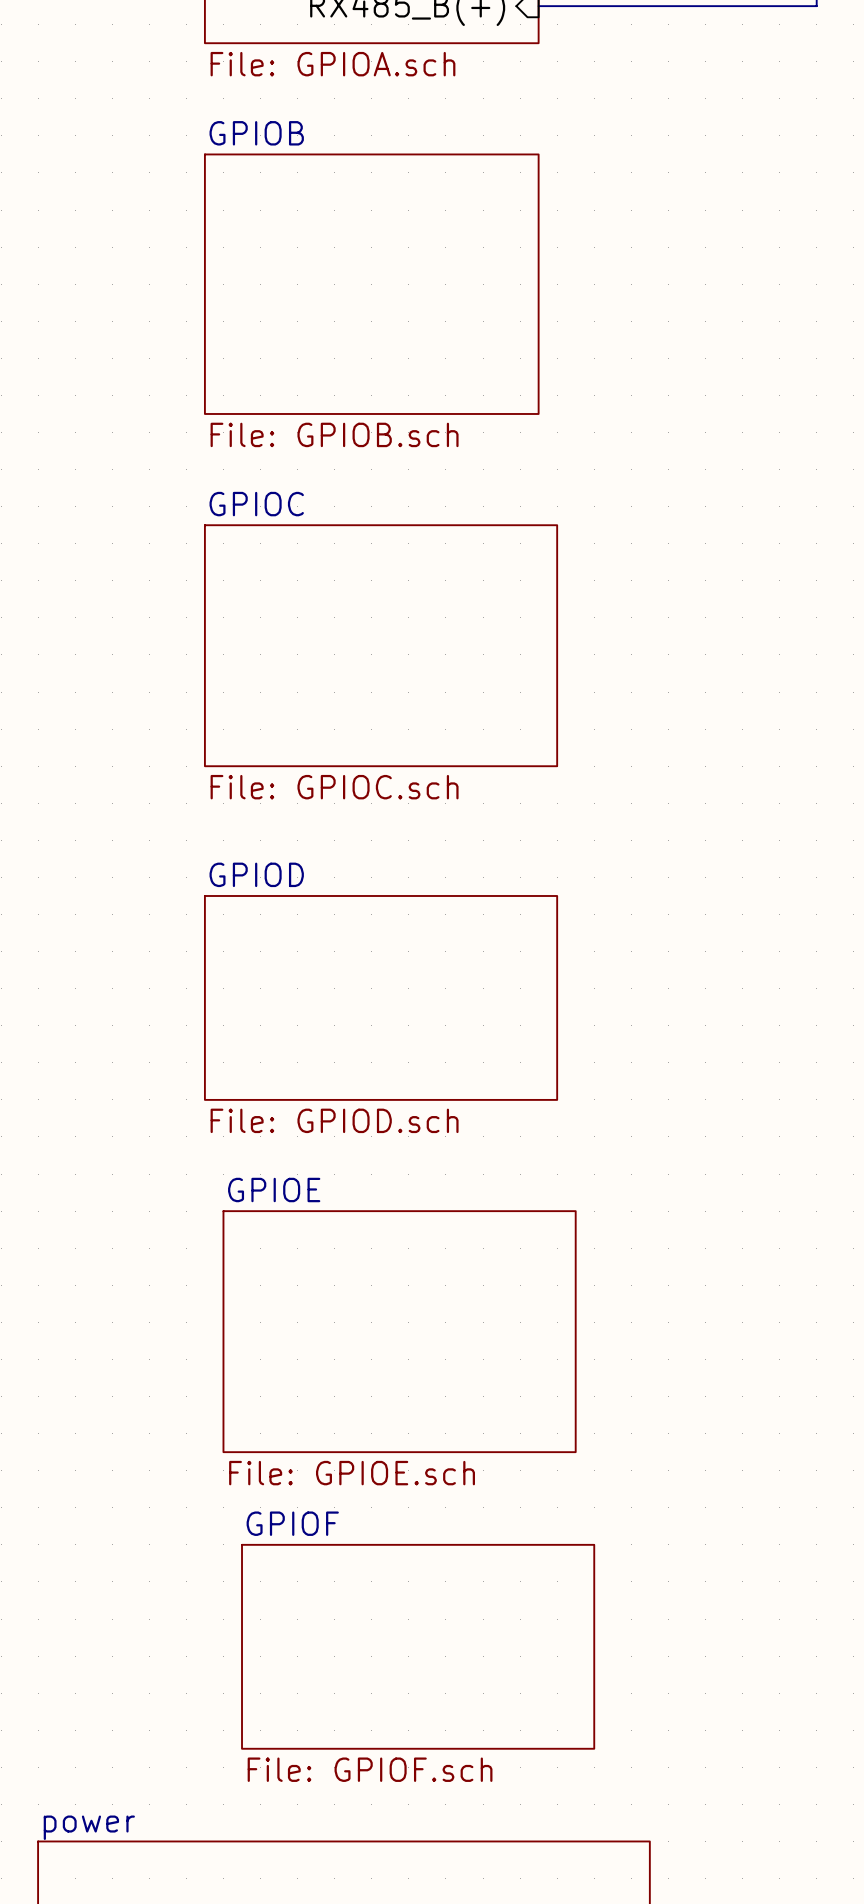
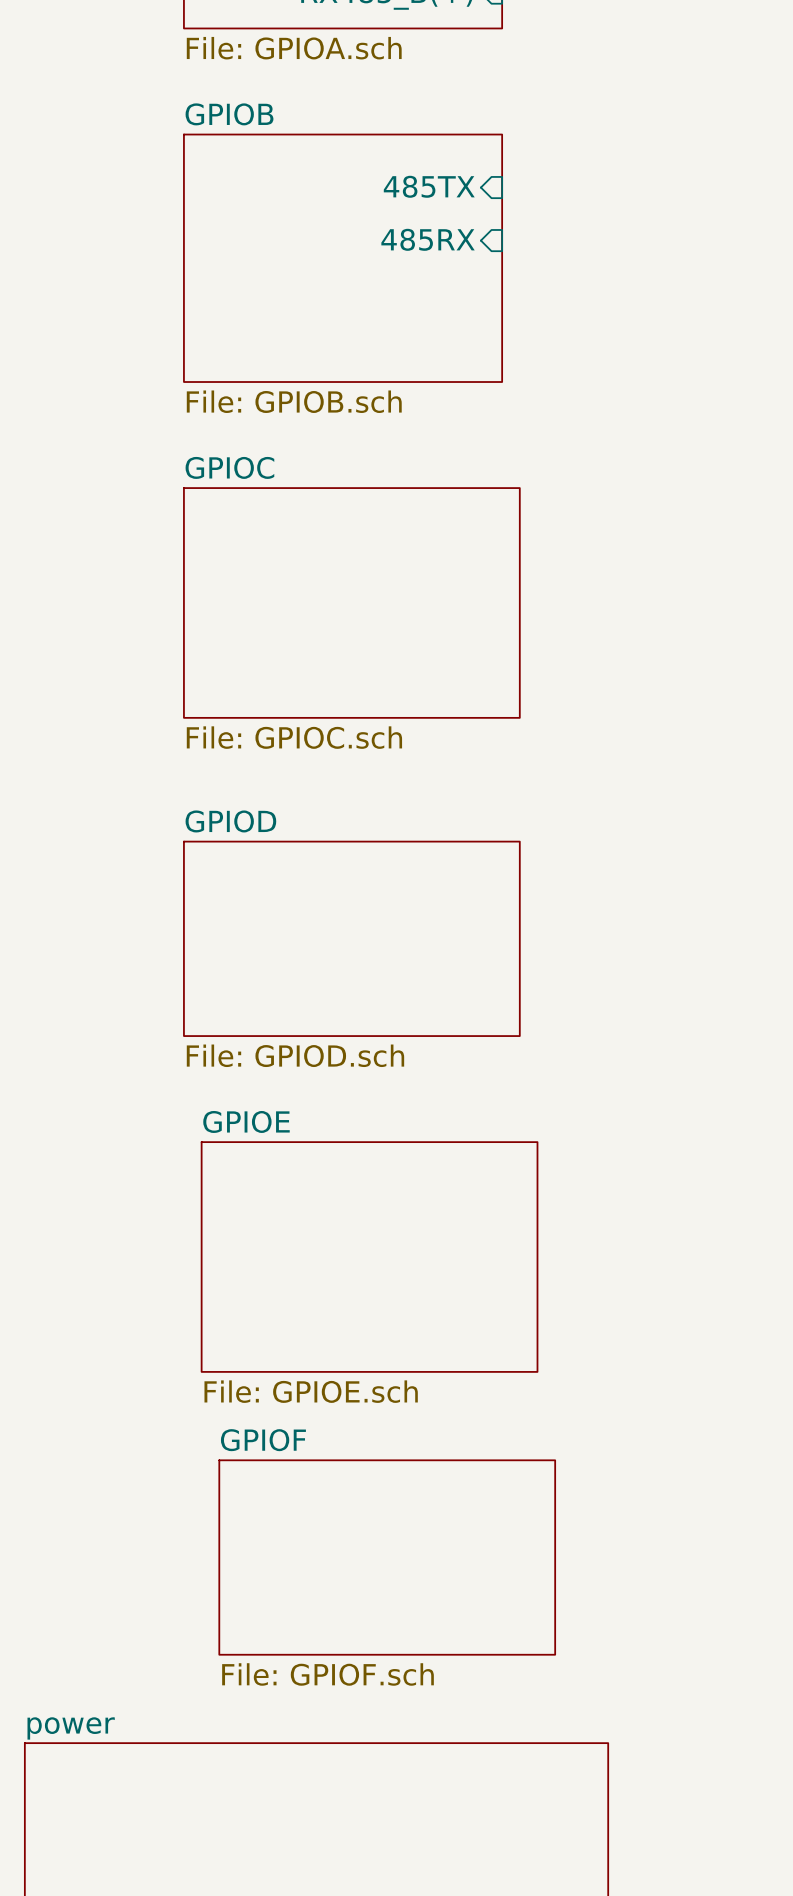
sheet pin: none -> 485TX (429, 186)
sheet pin: none -> 485RX (428, 239)

